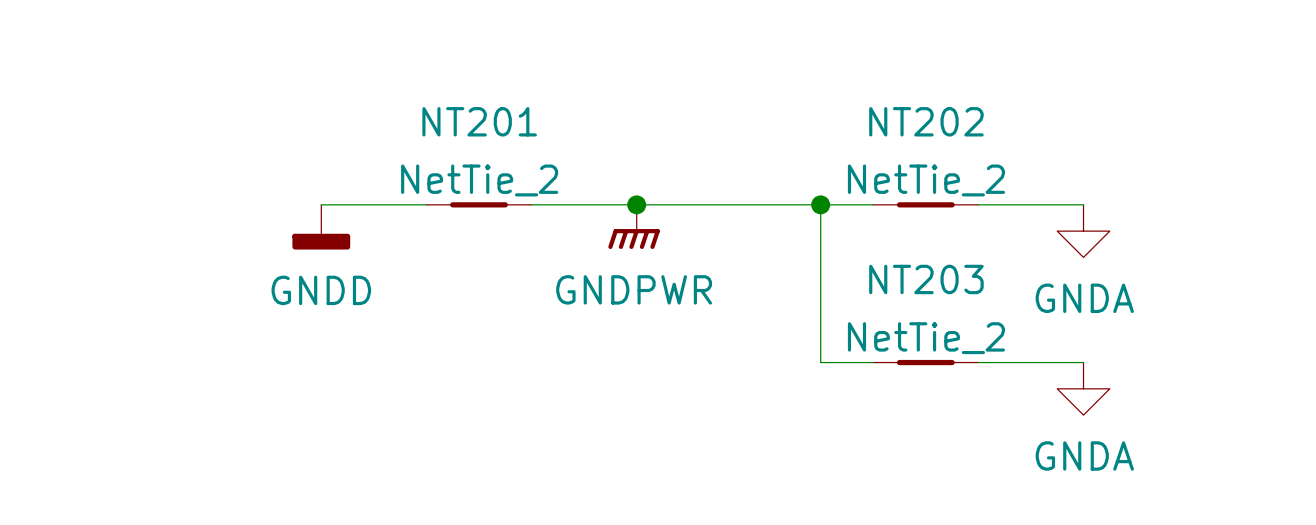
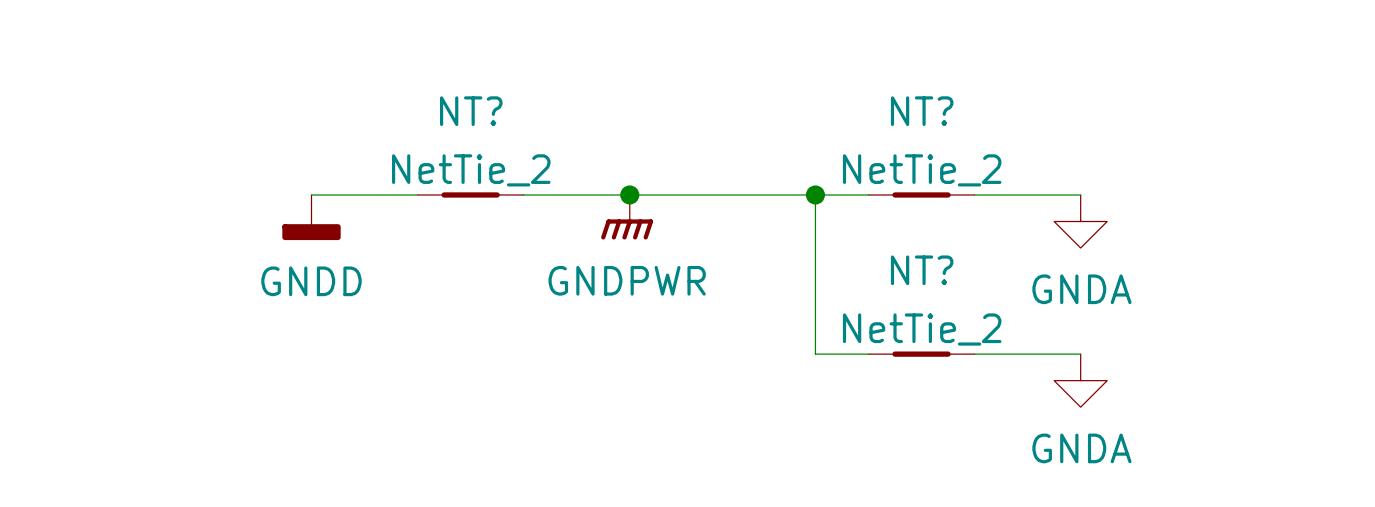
NT201 name: NT201 (479, 121) -> NT? (471, 111)
NT202 name: NT202 (926, 121) -> NT? (922, 111)
NT203 name: NT203 (926, 279) -> NT? (922, 270)

